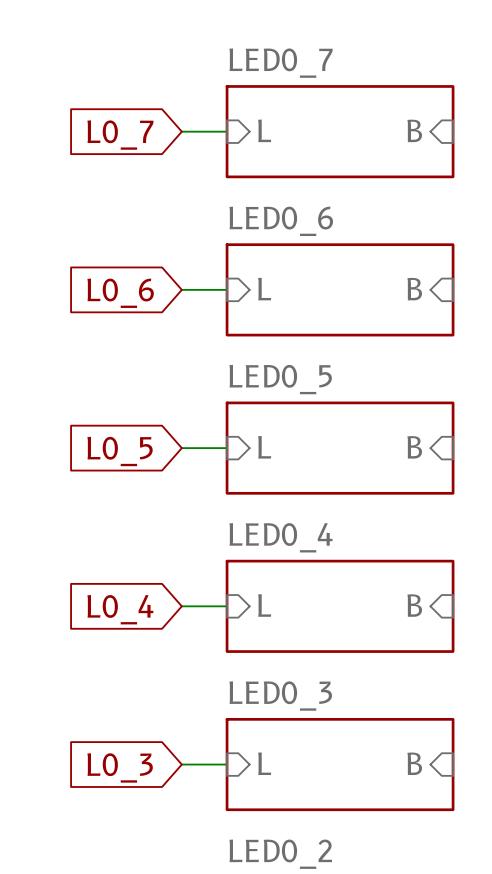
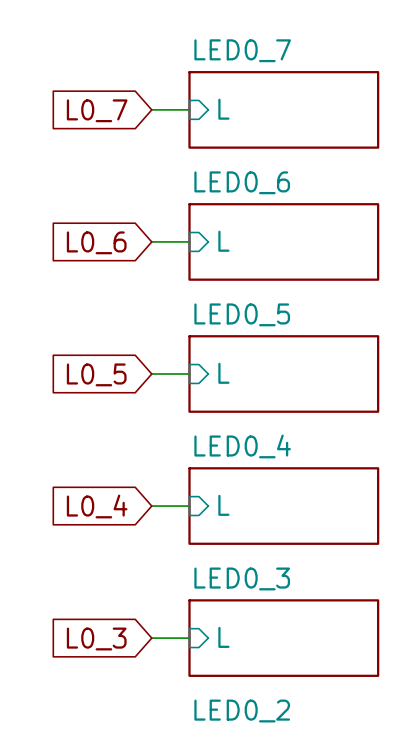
sheet pin: B (414, 130) -> none
sheet pin: B (414, 289) -> none
sheet pin: B (414, 447) -> none
sheet pin: B (414, 605) -> none
sheet pin: B (414, 763) -> none

